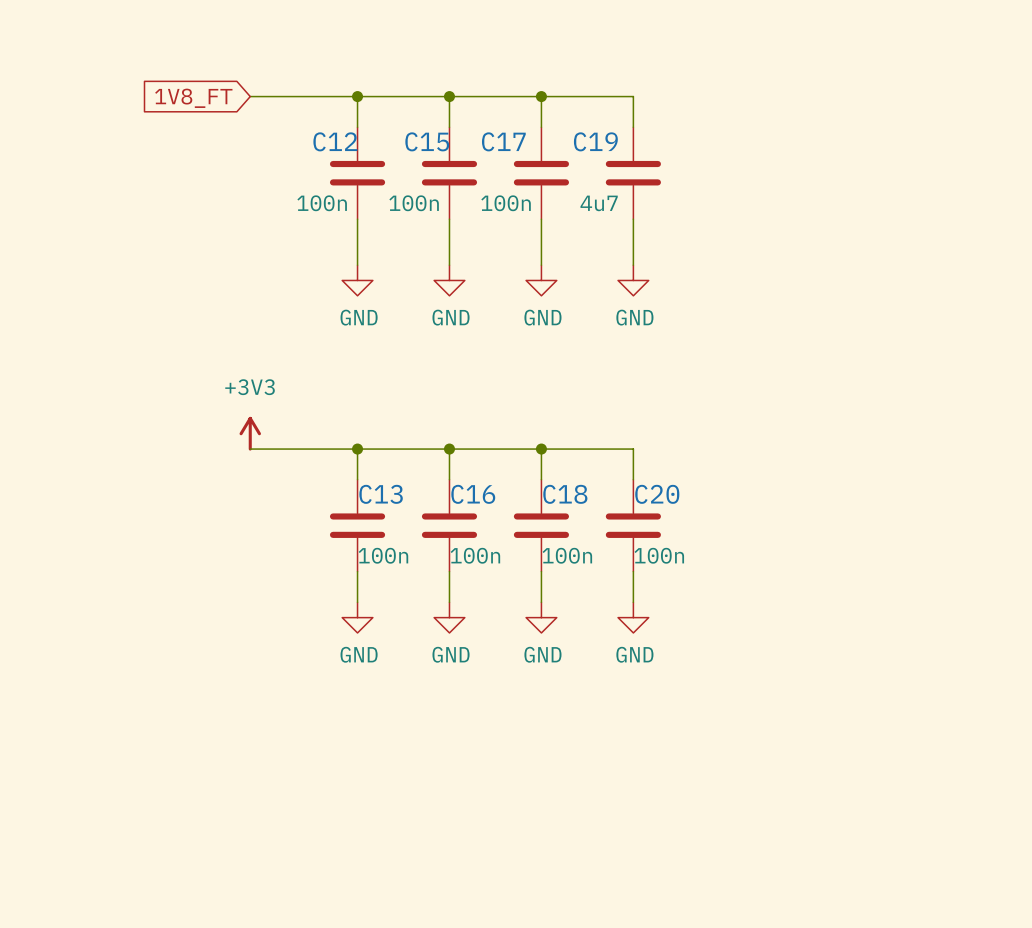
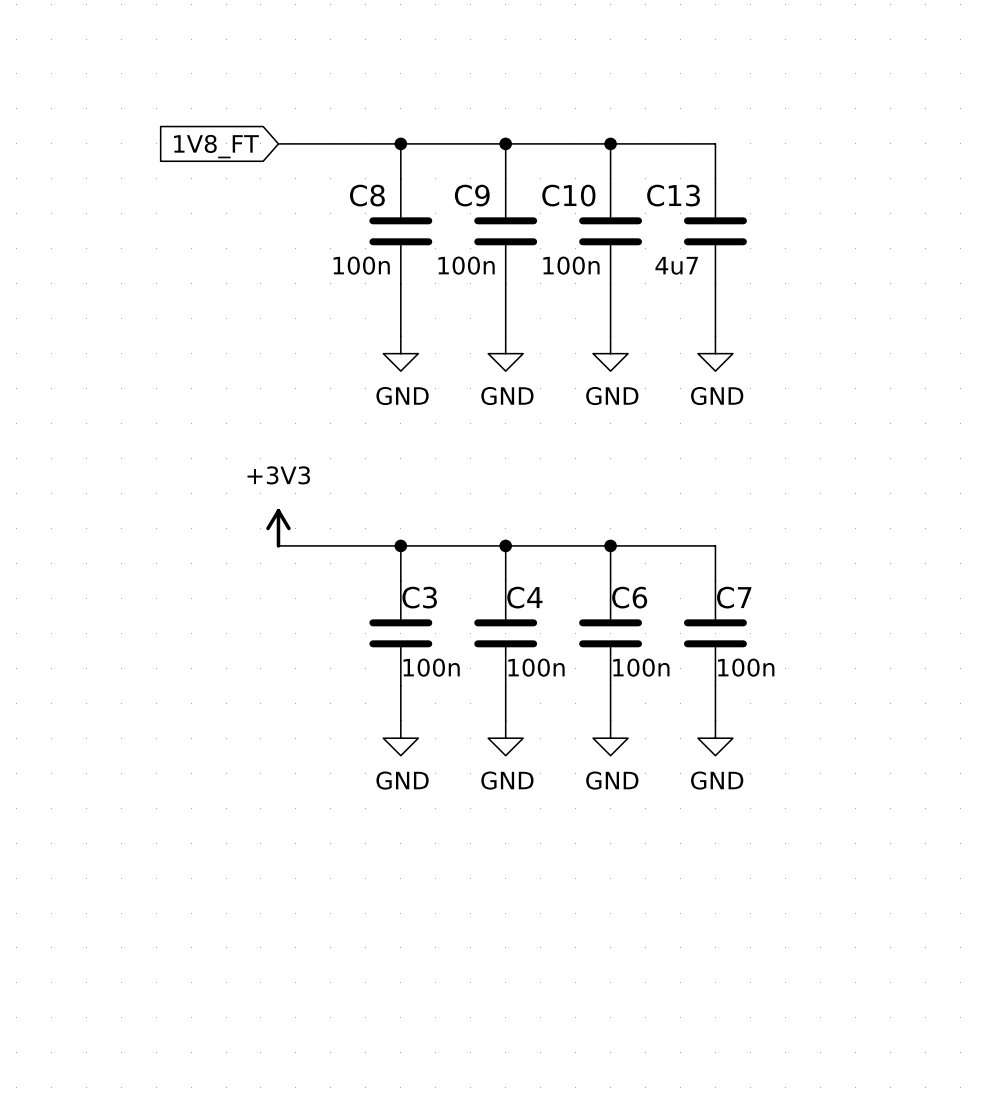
C12 name: C12 (335, 141) -> C8 (367, 195)
C15 name: C15 (427, 141) -> C9 (472, 195)
C17 name: C17 (503, 141) -> C10 (568, 195)
C19 name: C19 (595, 141) -> C13 (673, 195)
C13 name: C13 (381, 494) -> C3 (419, 597)
C16 name: C16 (473, 494) -> C4 (524, 597)
C18 name: C18 (565, 494) -> C6 (629, 597)
C20 name: C20 (657, 494) -> C7 (734, 597)

